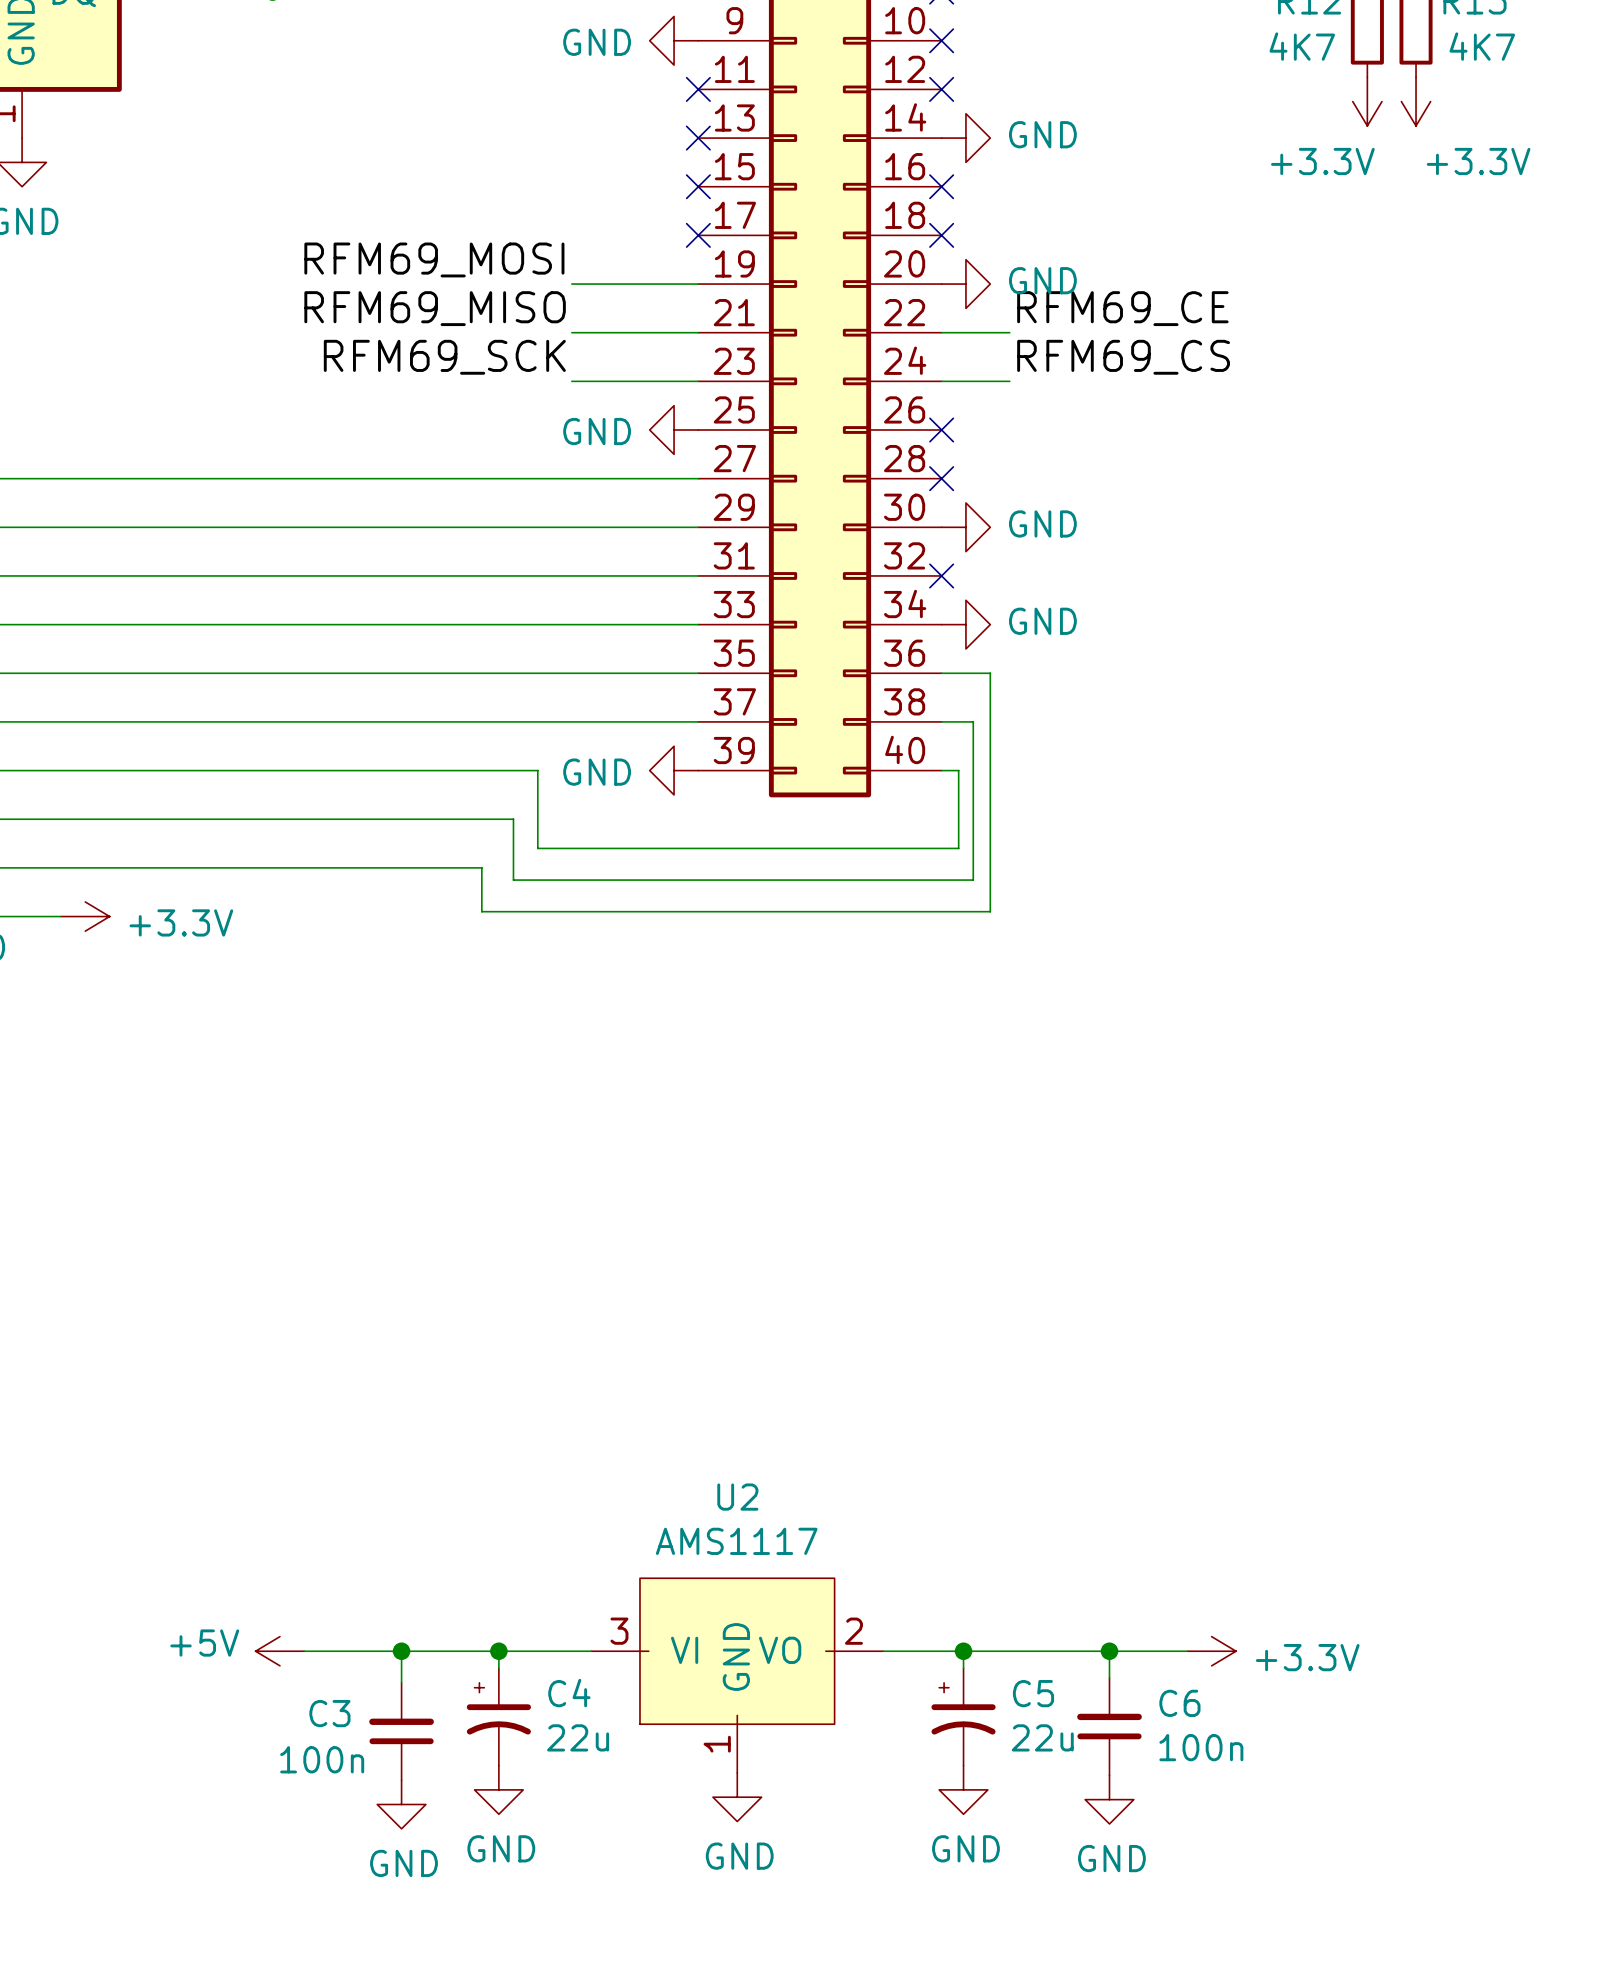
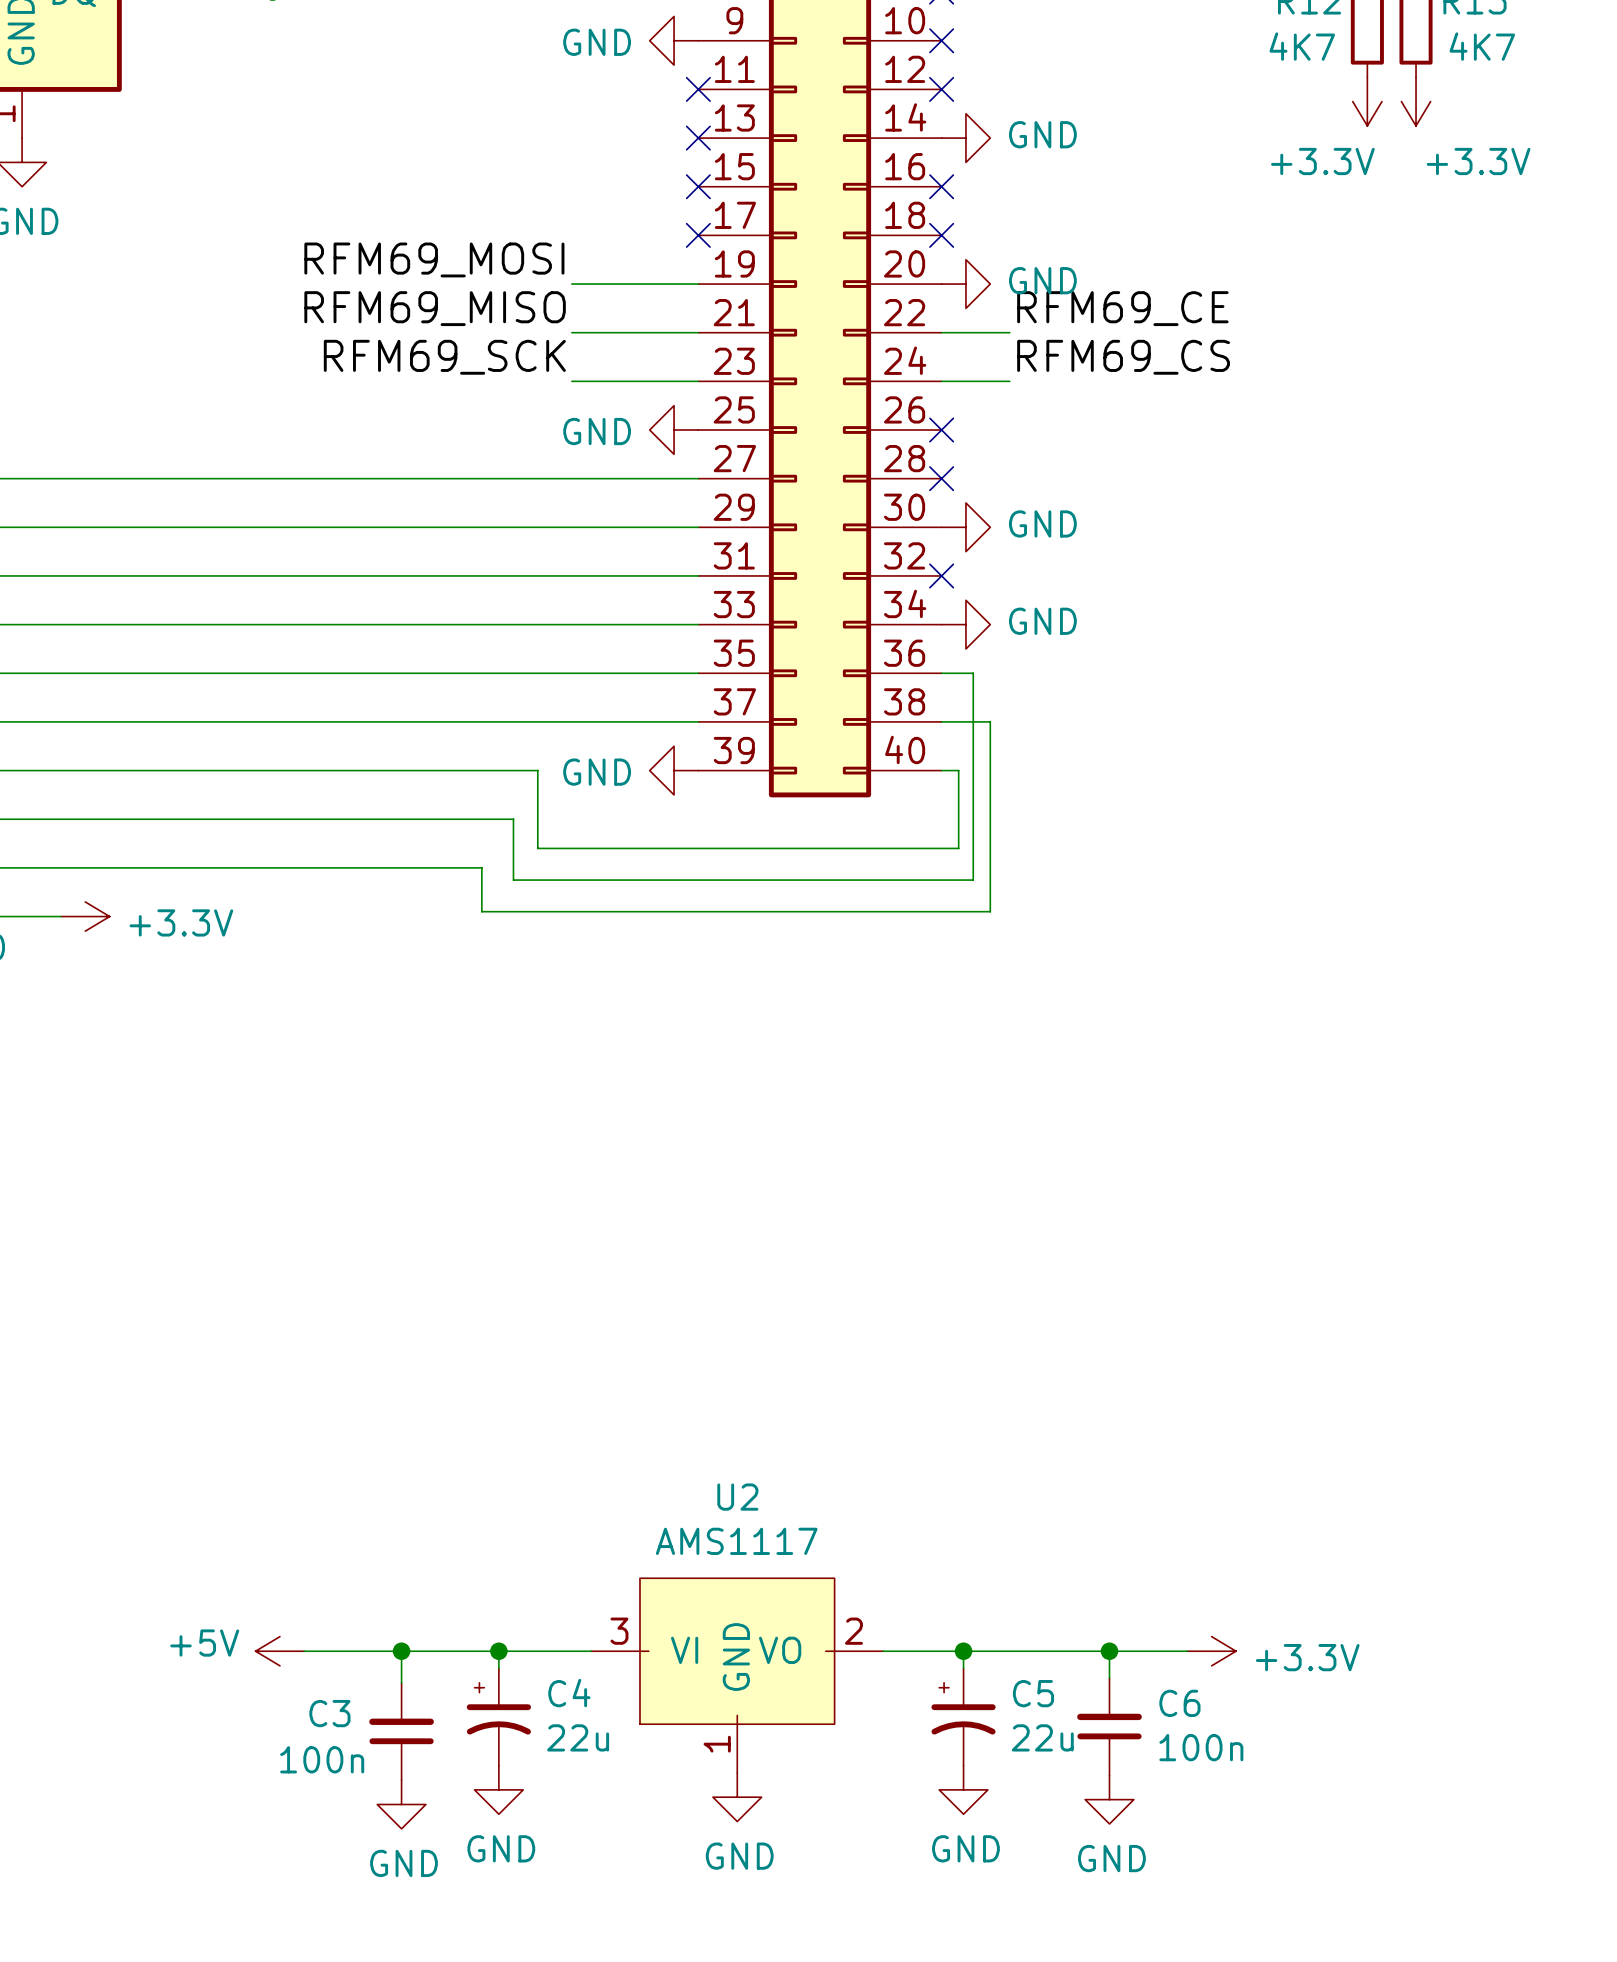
wire: (973, 673) (990, 673) (990, 721) -> (973, 673) (973, 721) (990, 721)

